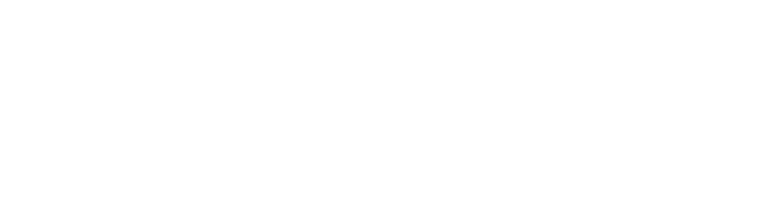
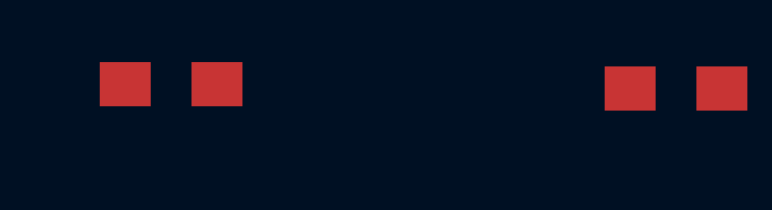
part: none -> (171, 84)
part: none -> (676, 88)

